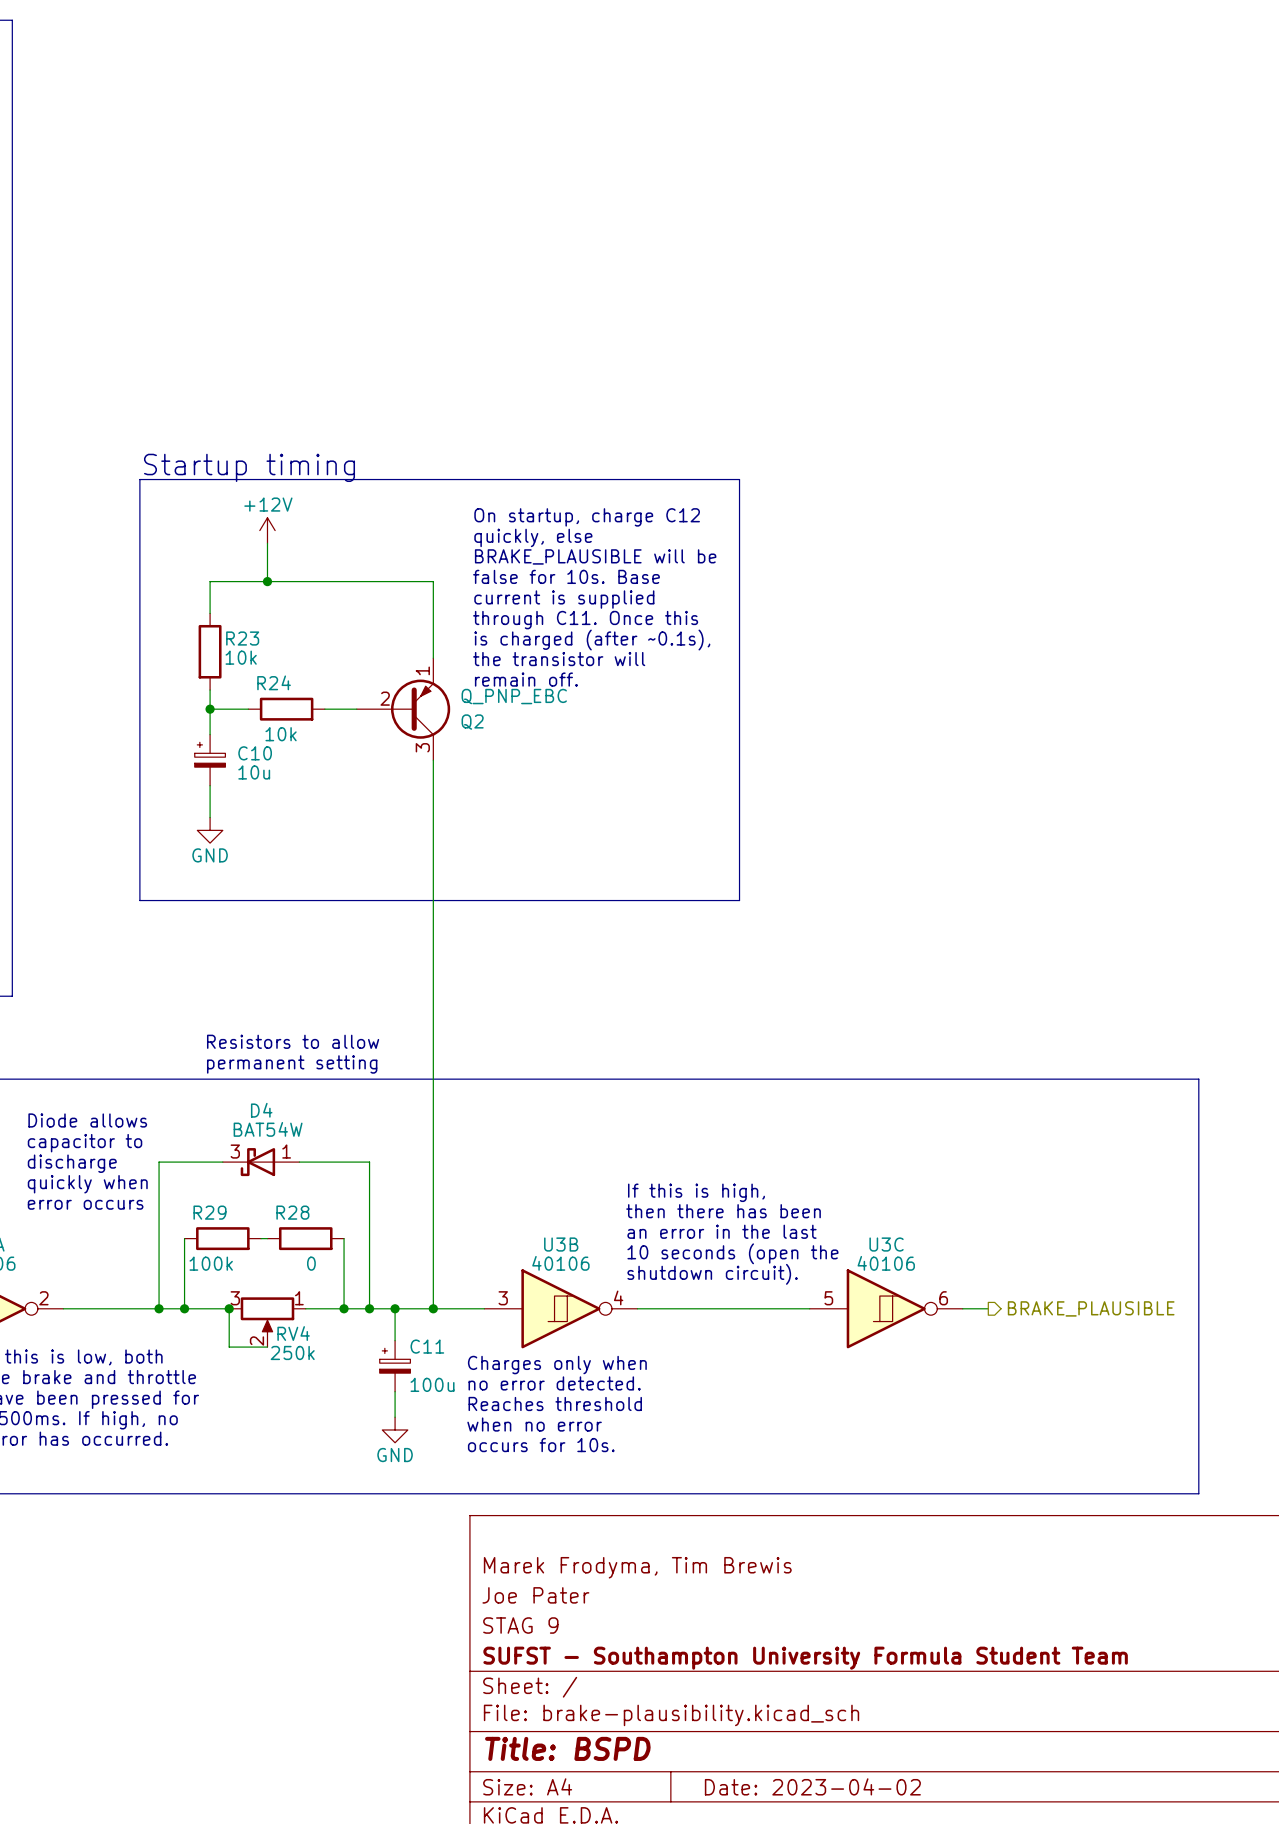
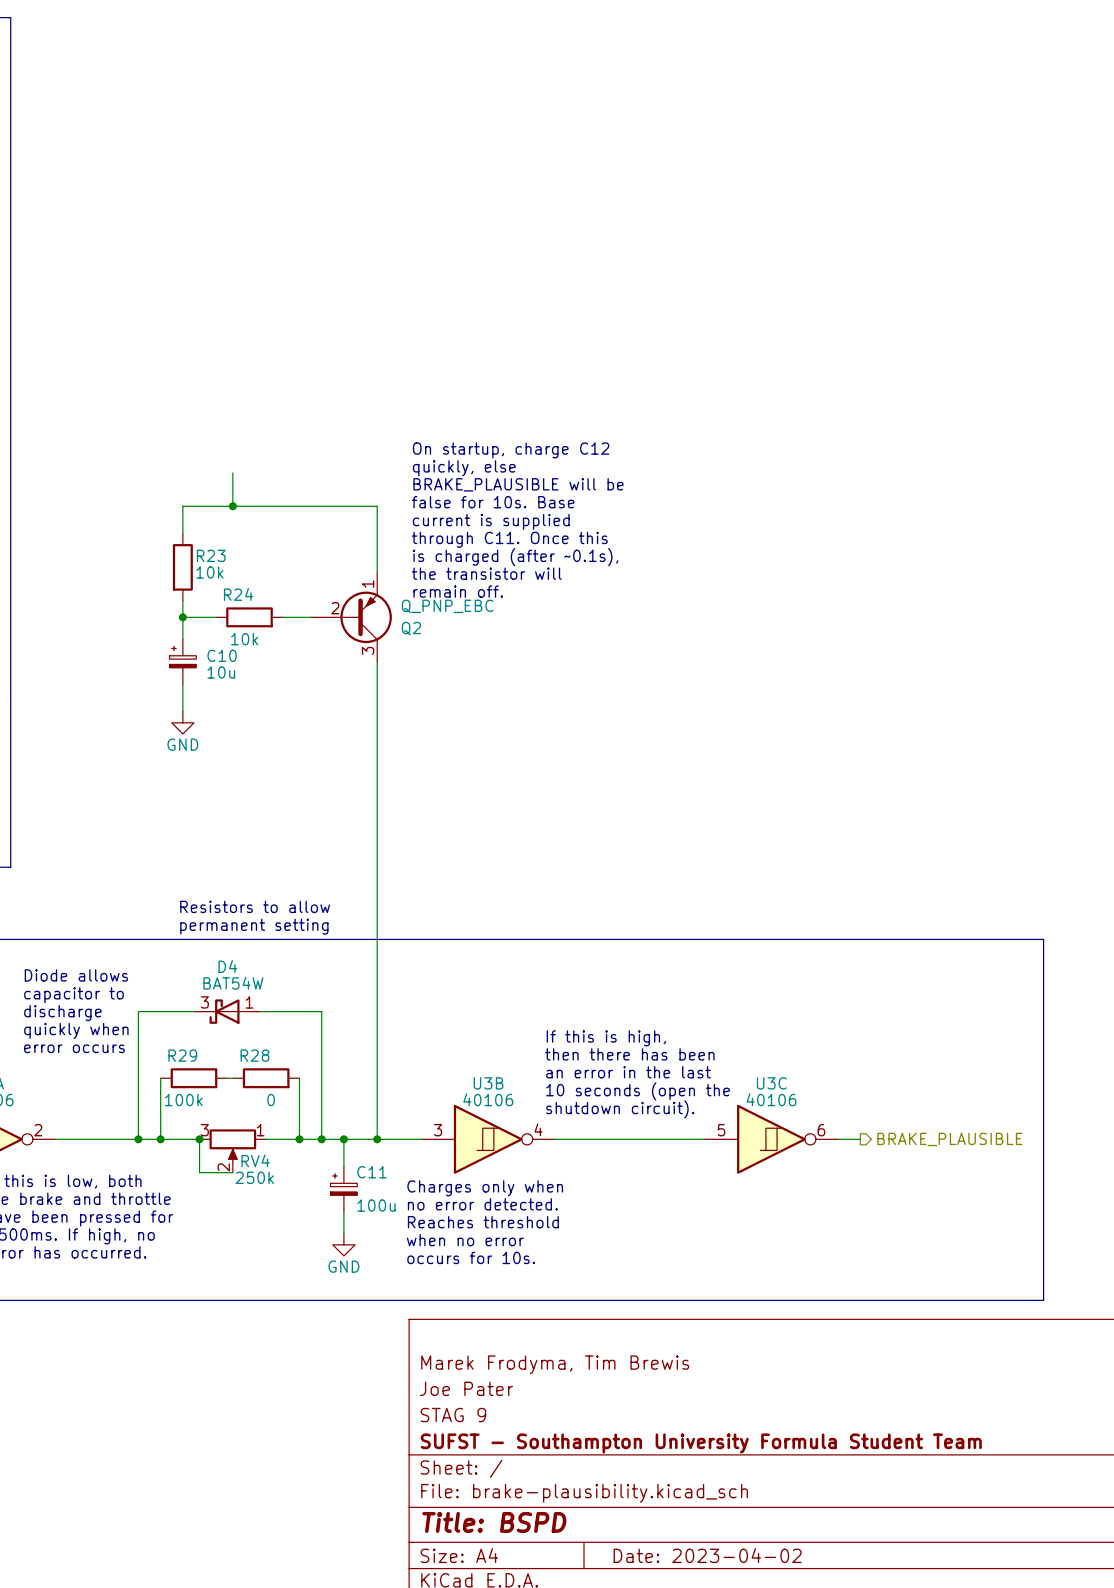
text: Startup timing (249, 467) -> none
line: (139, 479) (739, 479) (739, 900) (139, 900) (139, 479) -> none
power symbol: +12V (267, 530) -> none

